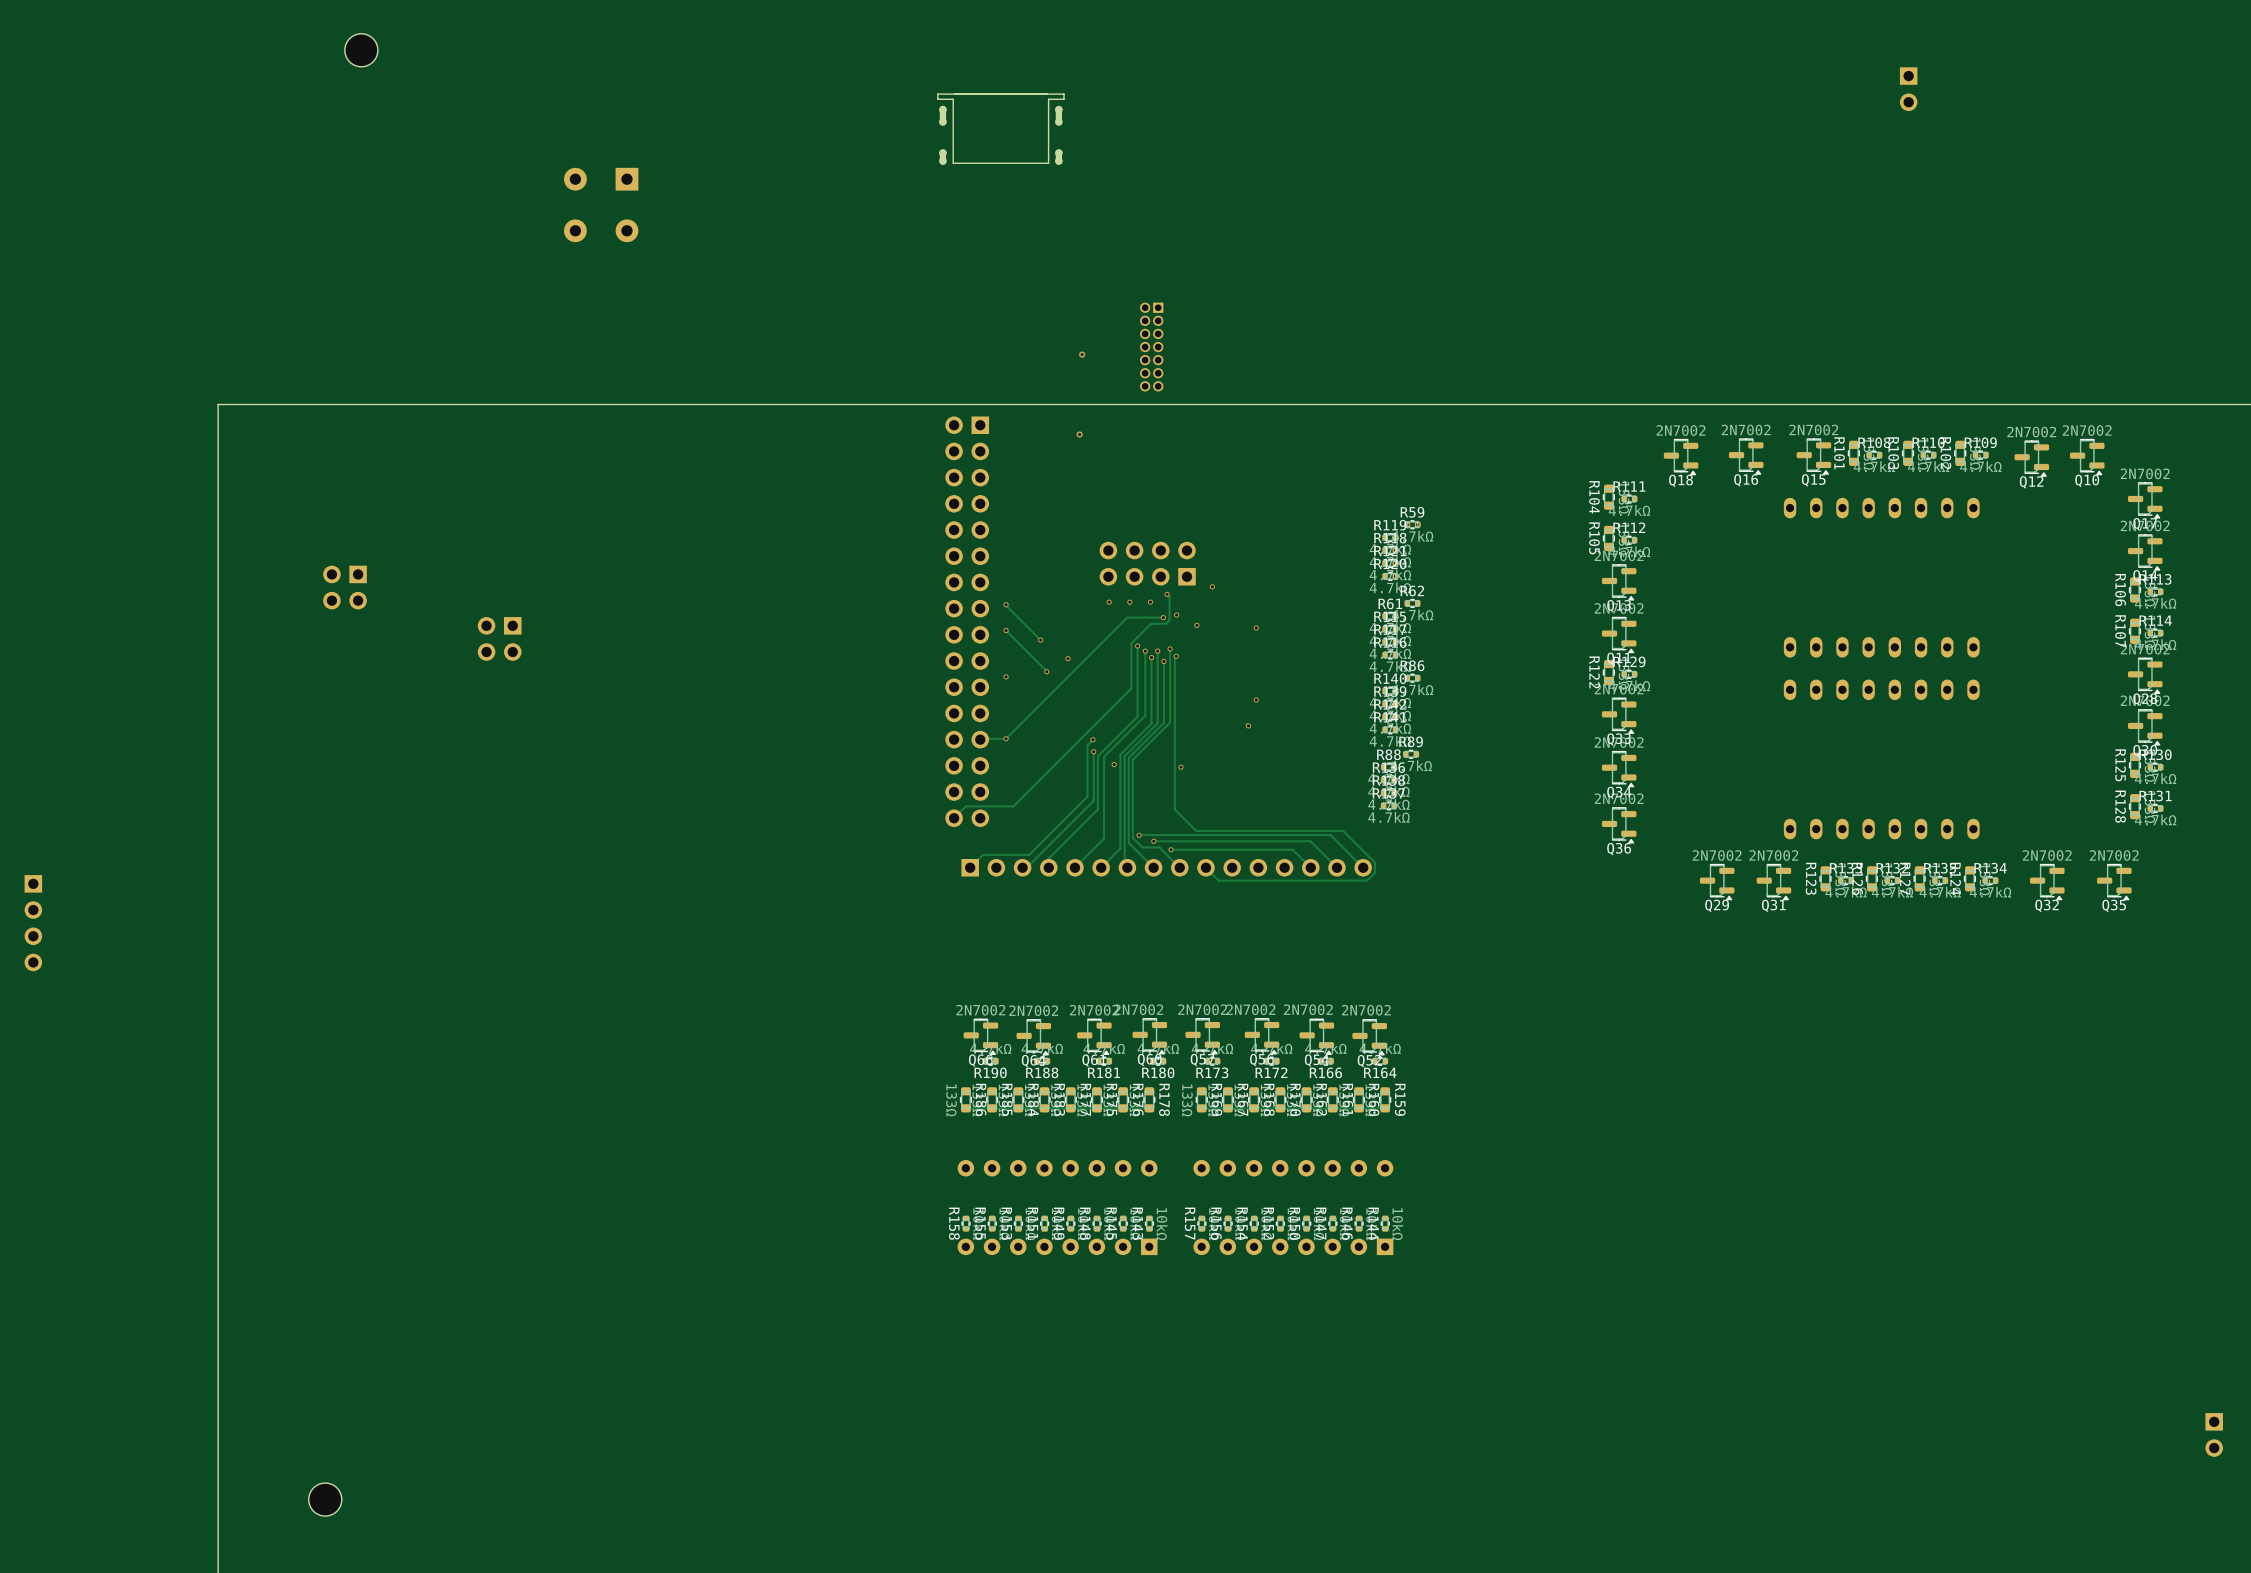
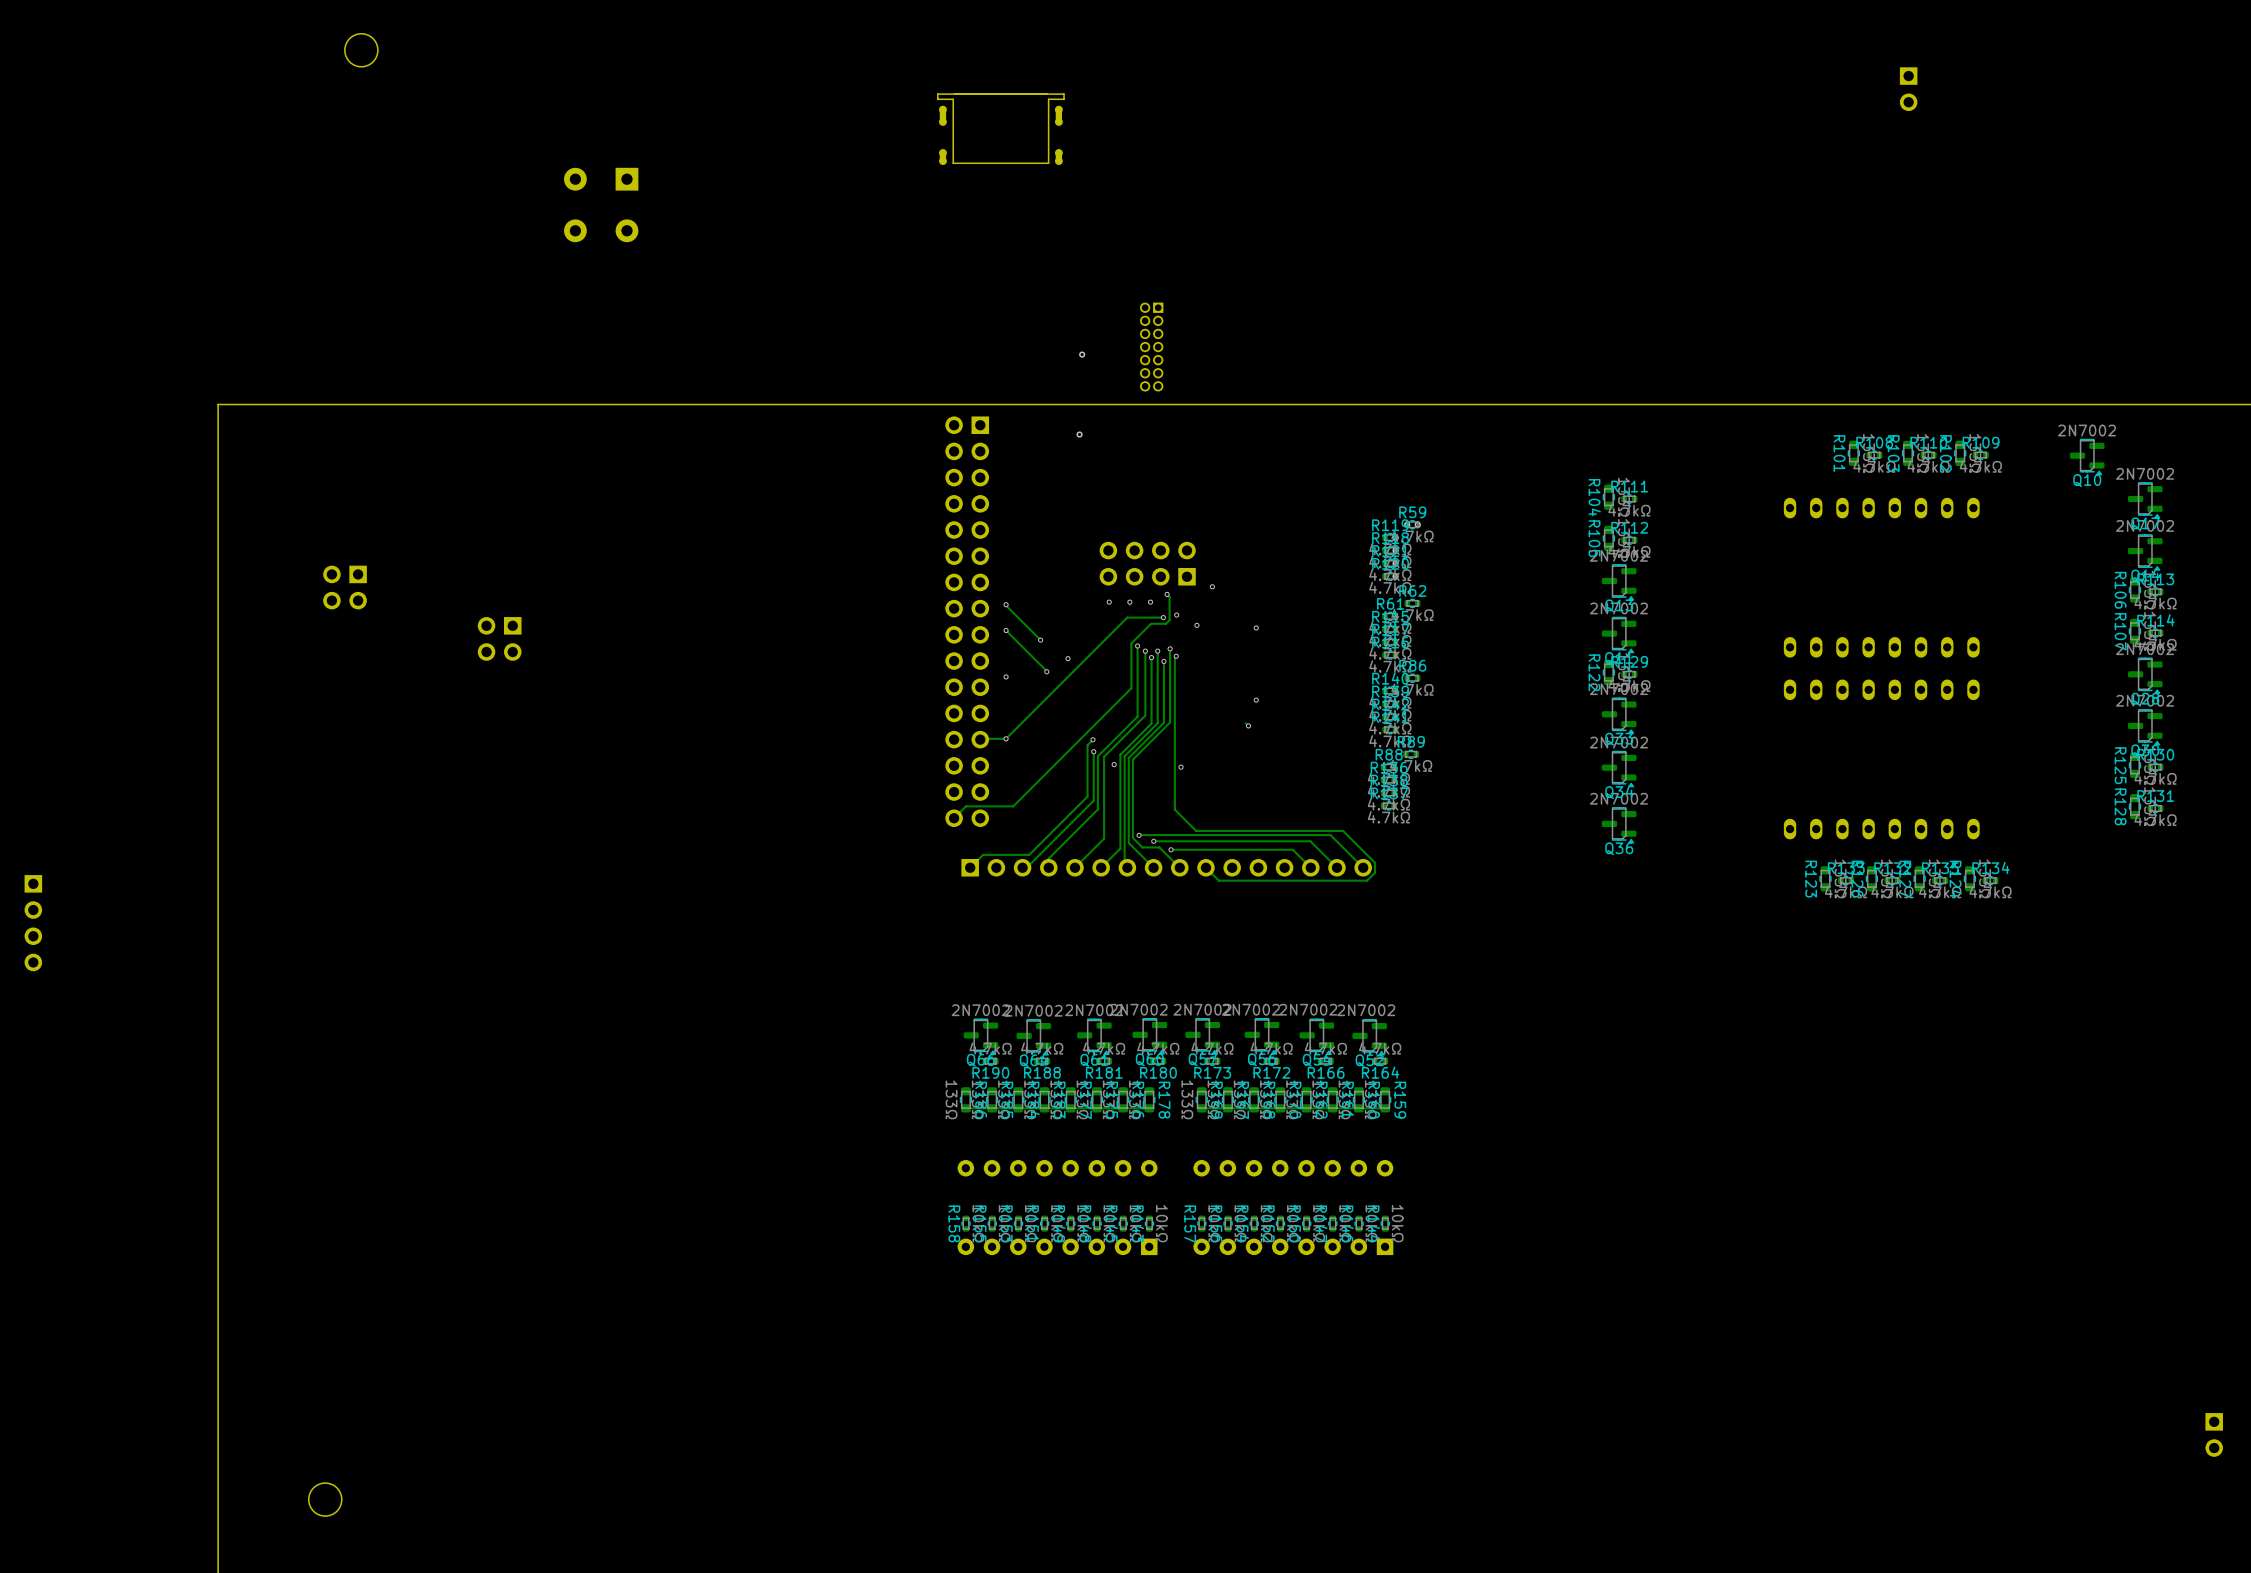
Q16: 2N7002 (1746, 456) -> none
Q15: 2N7002 (1813, 456) -> none
Q18: 2N7002 (1681, 457) -> none
Q12: 2N7002 (2031, 458) -> none
Q29: 2N7002 (1717, 882) -> none
Q31: 2N7002 (1773, 882) -> none
Q32: 2N7002 (2047, 882) -> none
Q35: 2N7002 (2114, 882) -> none

